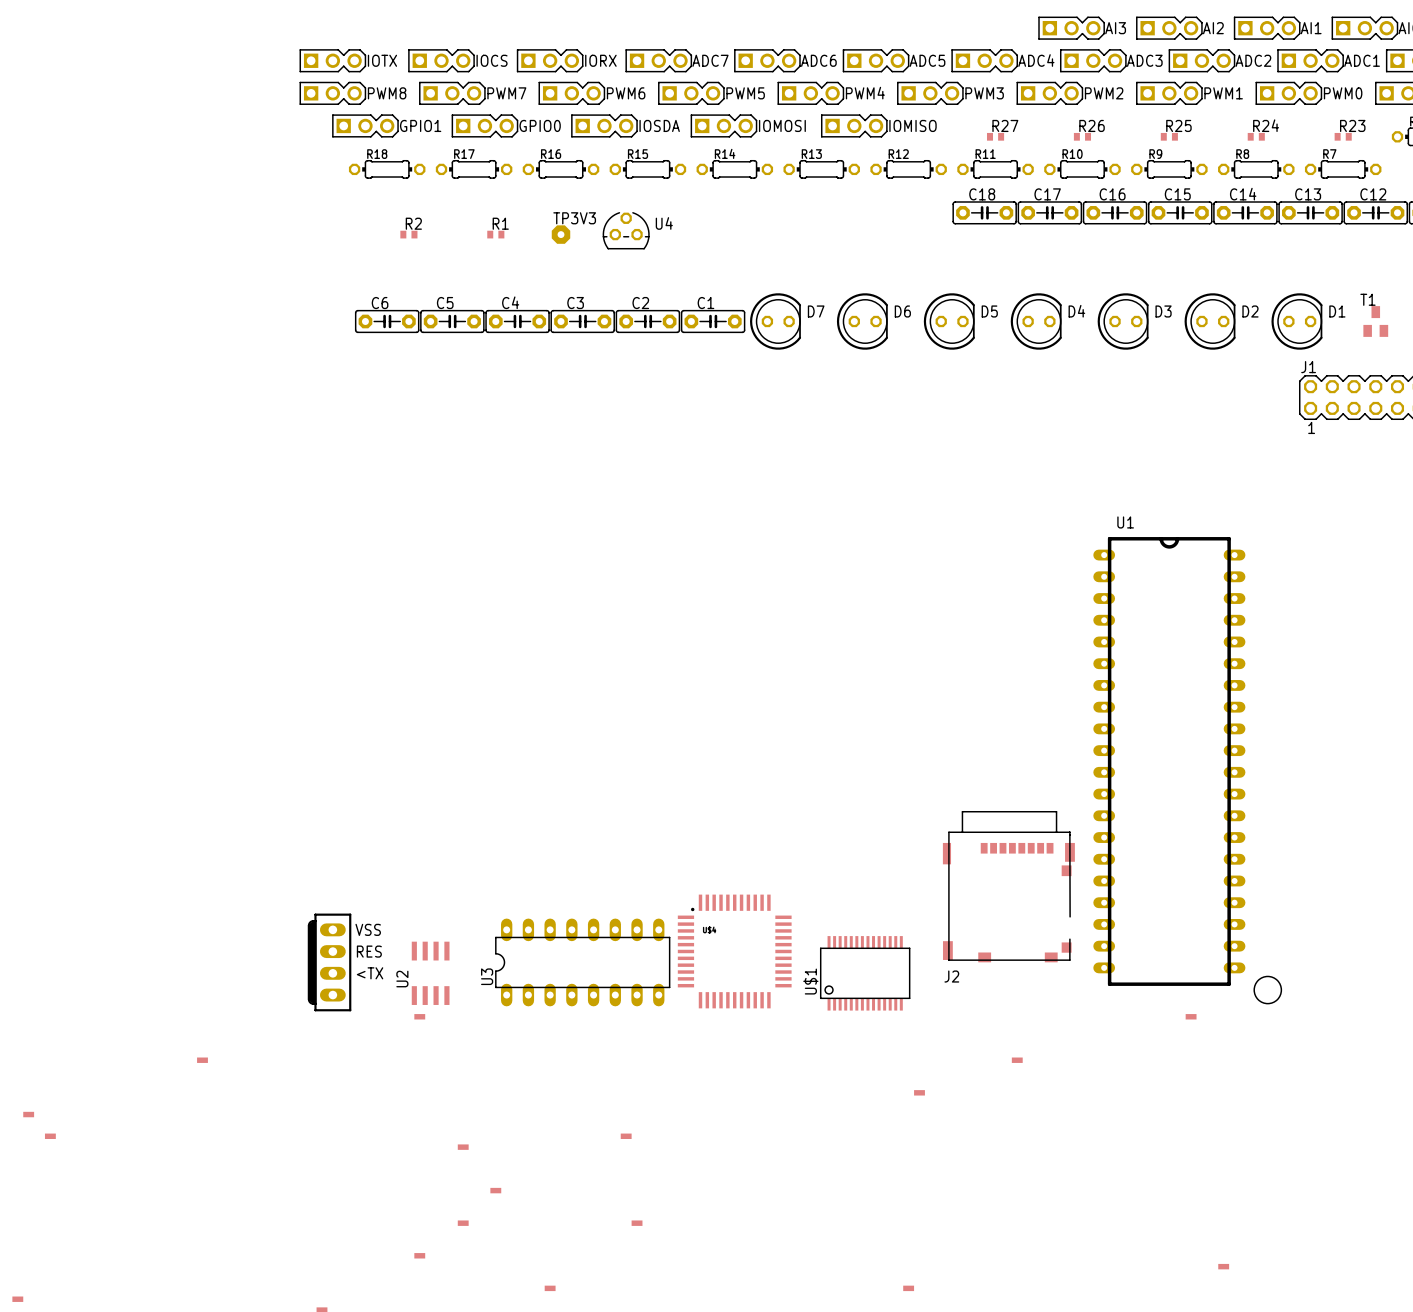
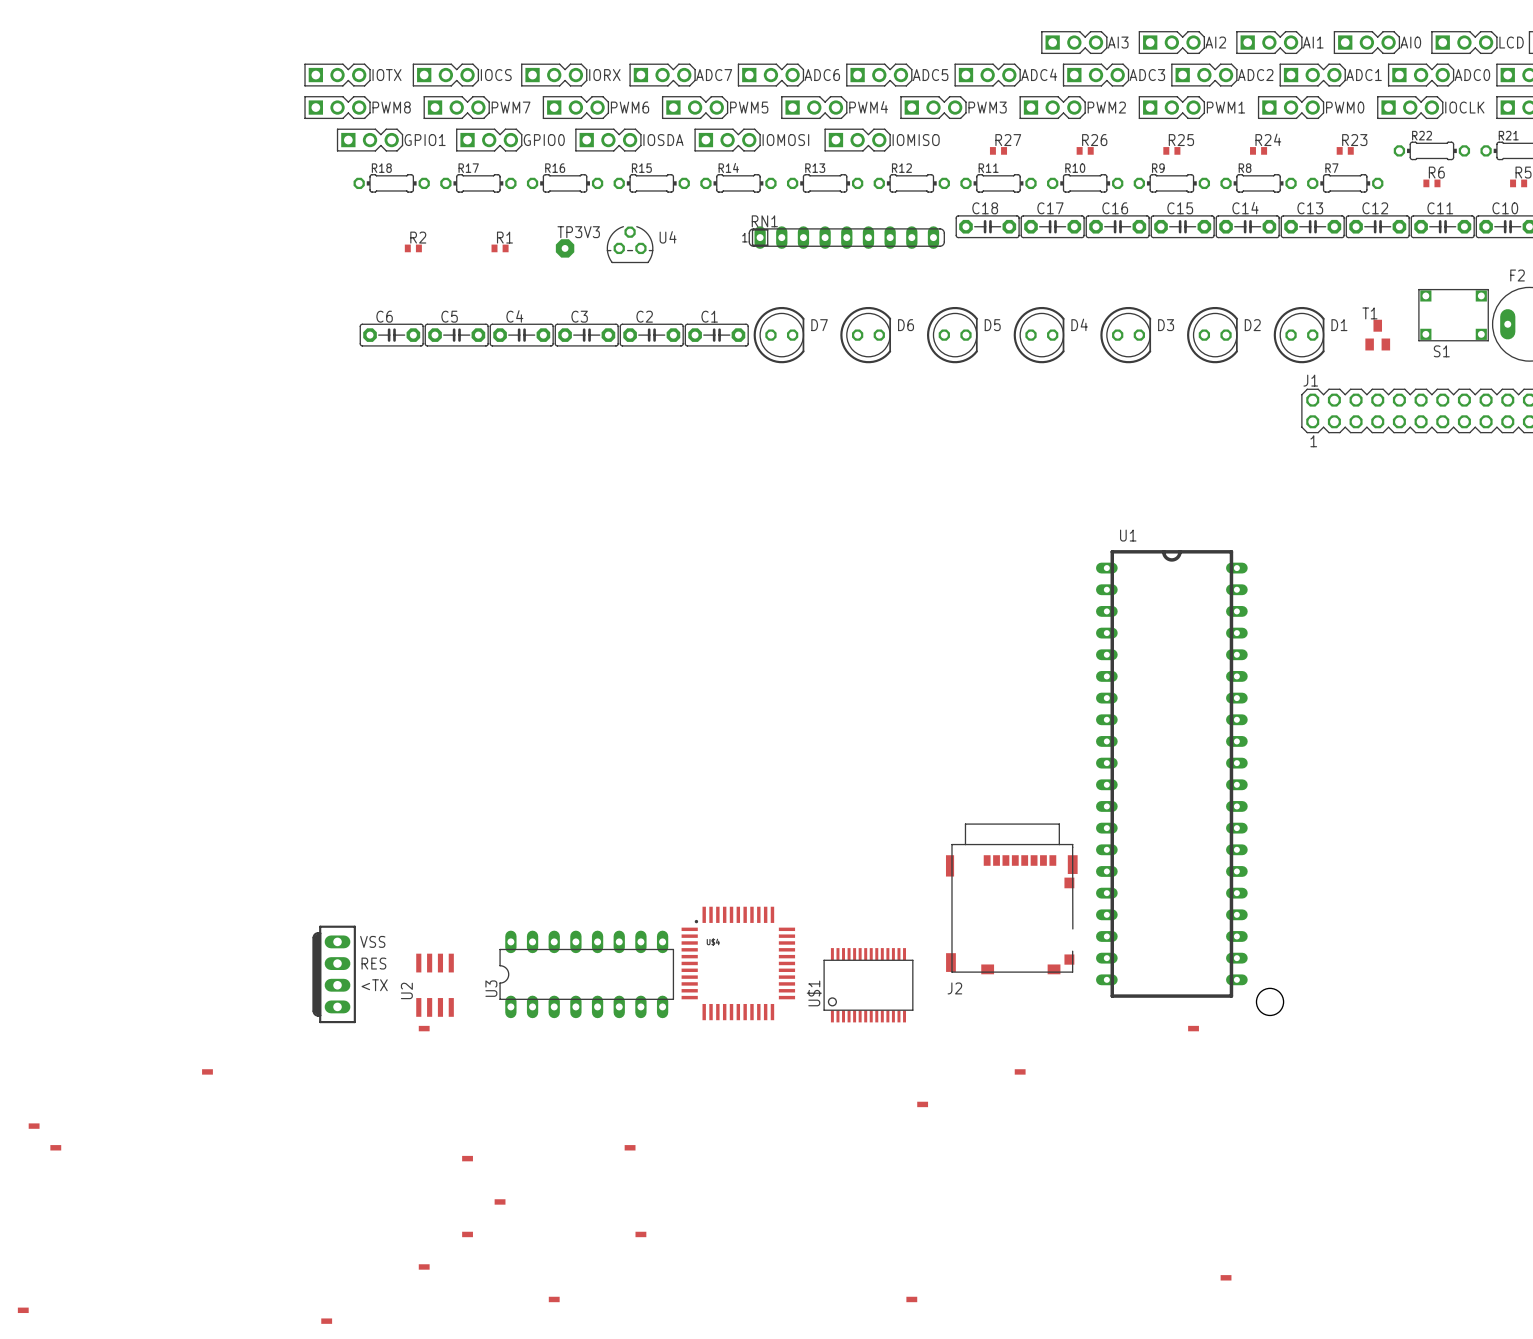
RN1: none -> (846, 237)

